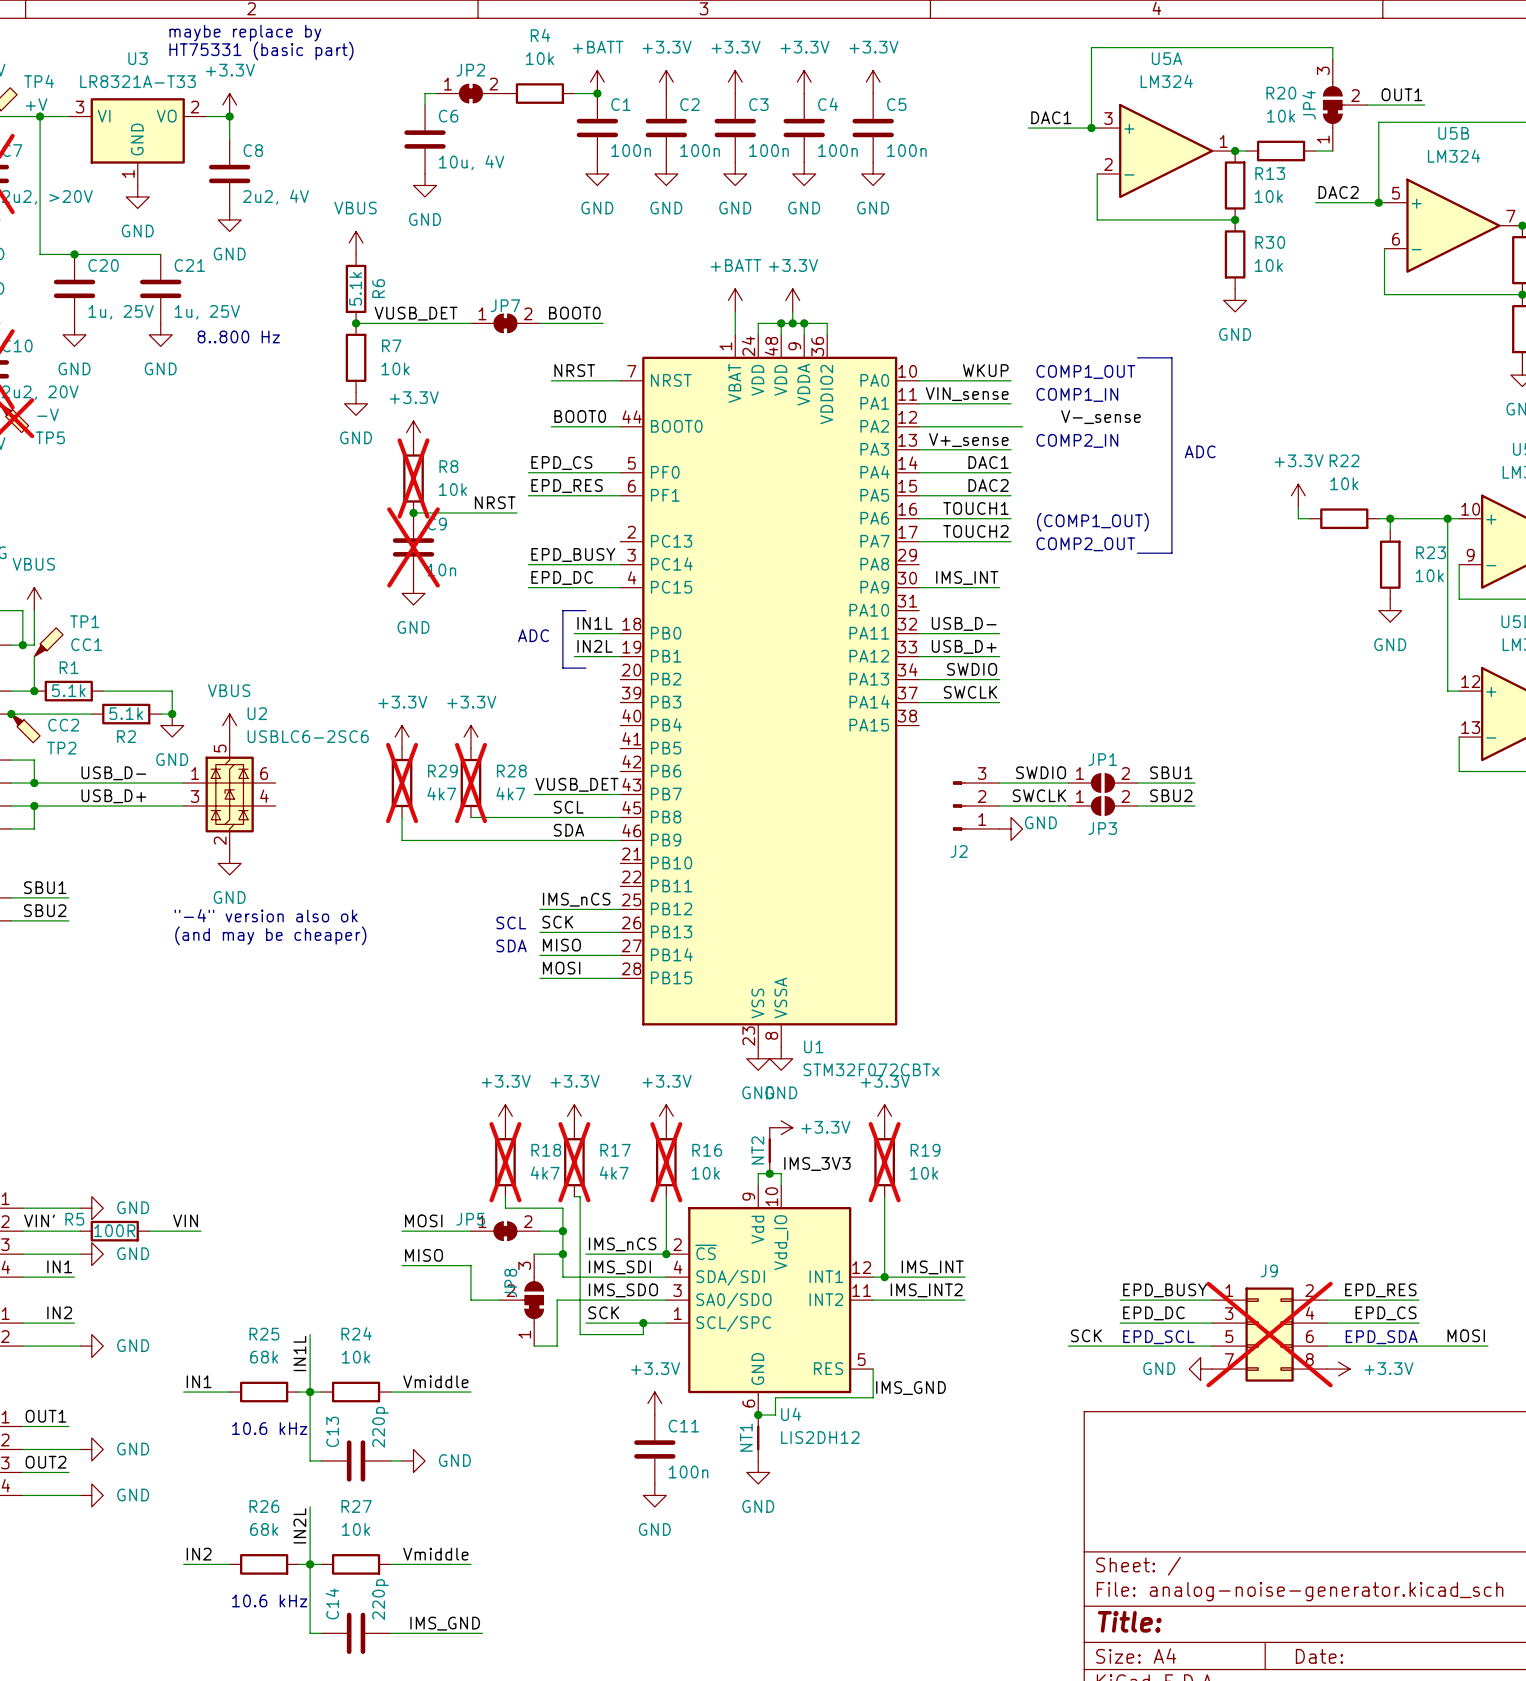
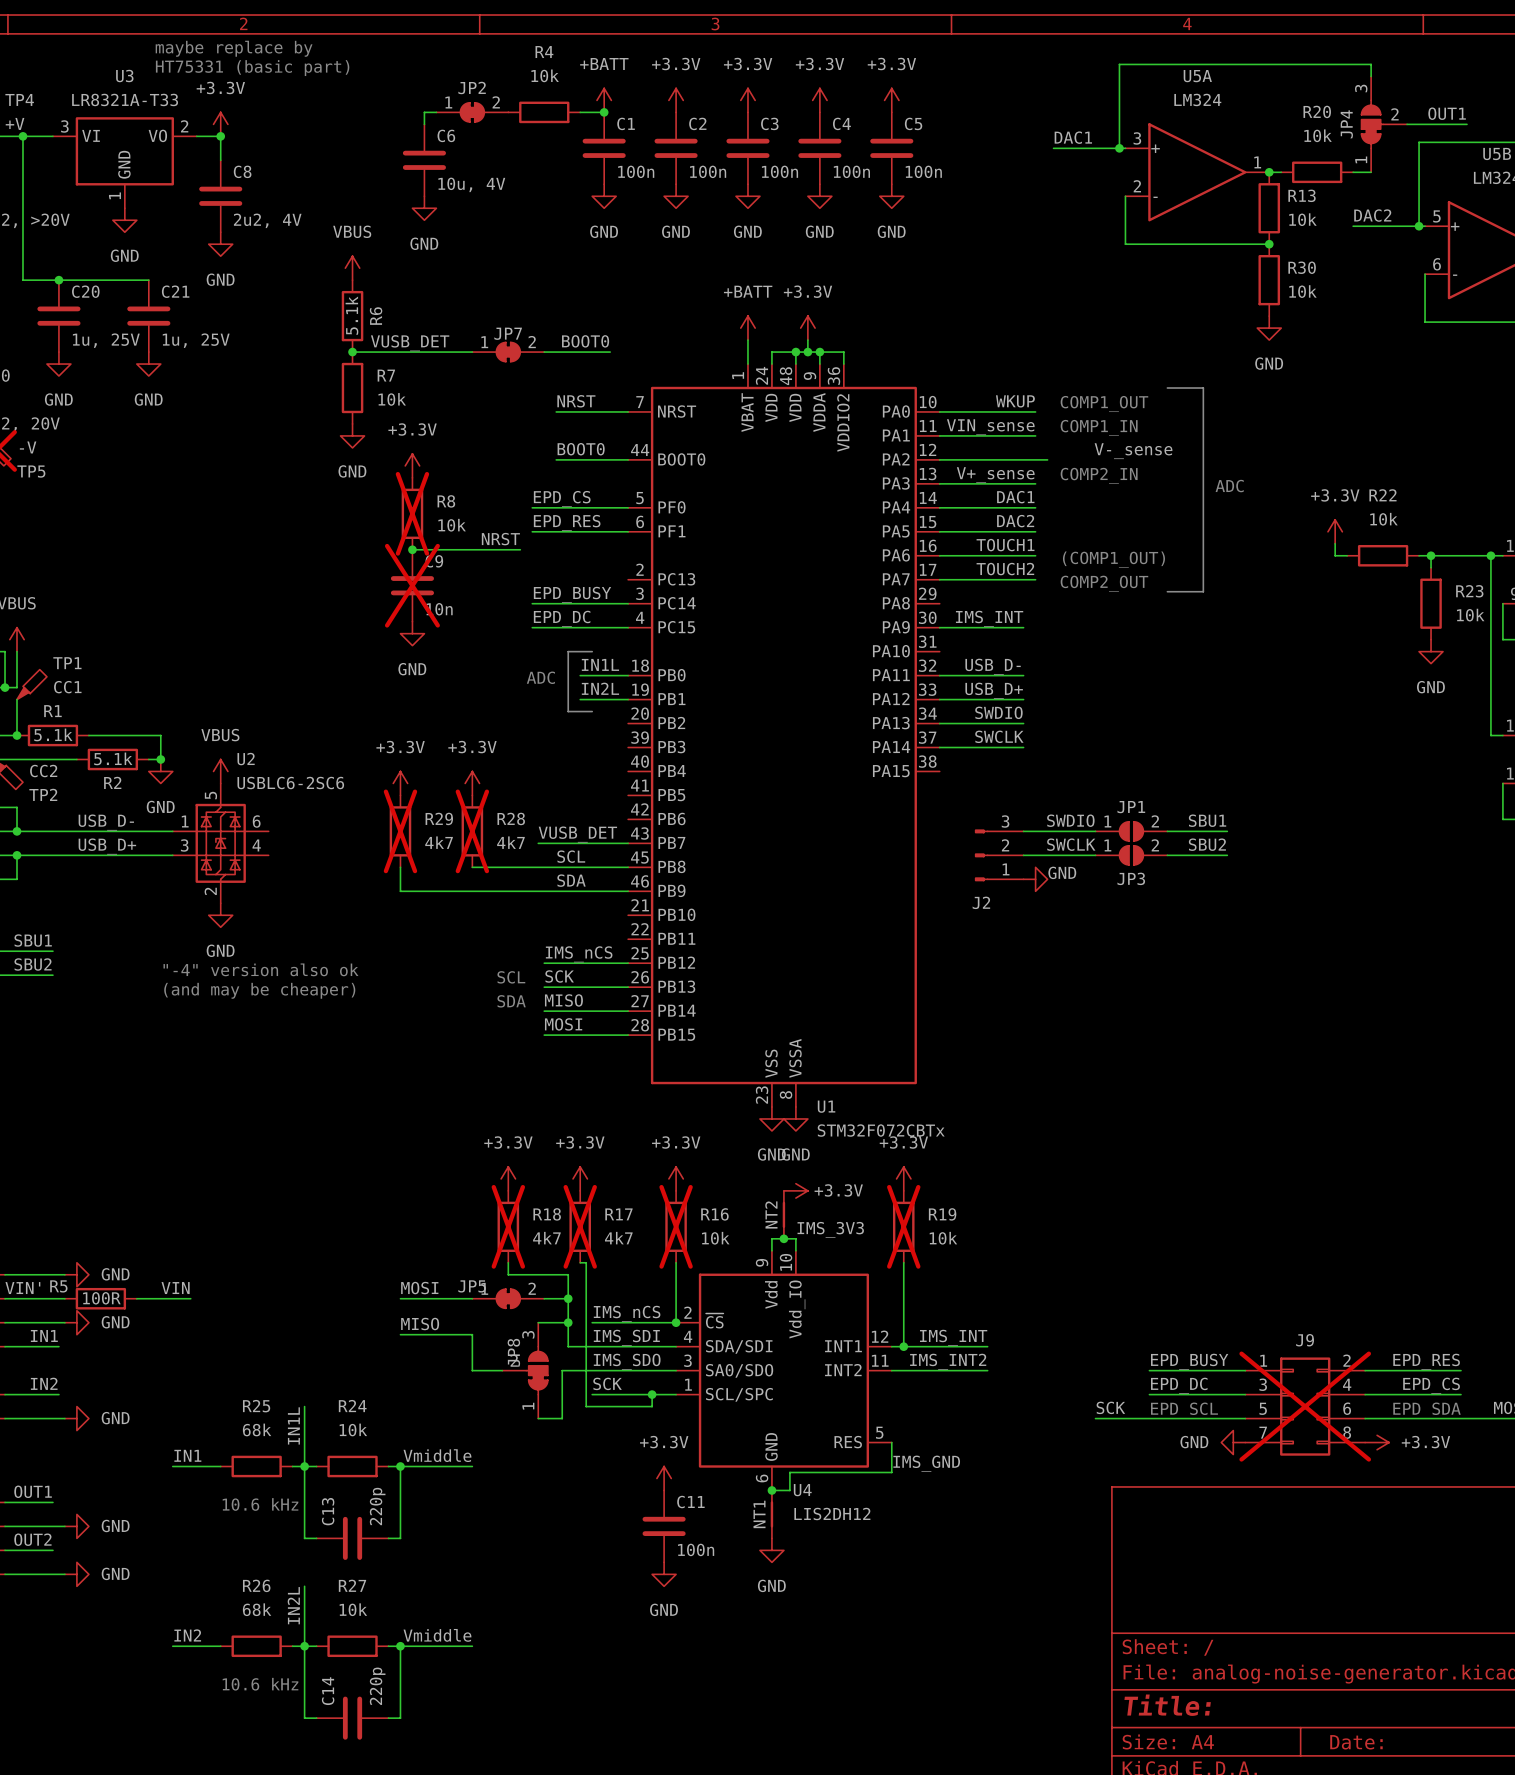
text: 8..800 Hz (238, 336) -> none
wire: none -> (400, 1466) (400, 1538)
junction: none -> (400, 1466)
power symbol: GND (413, 1460) -> none
junction: none -> (400, 1646)
label: IMS_GND (445, 1623) -> none
wire: (402, 1633) (482, 1633) -> (400, 1718) (400, 1646)

